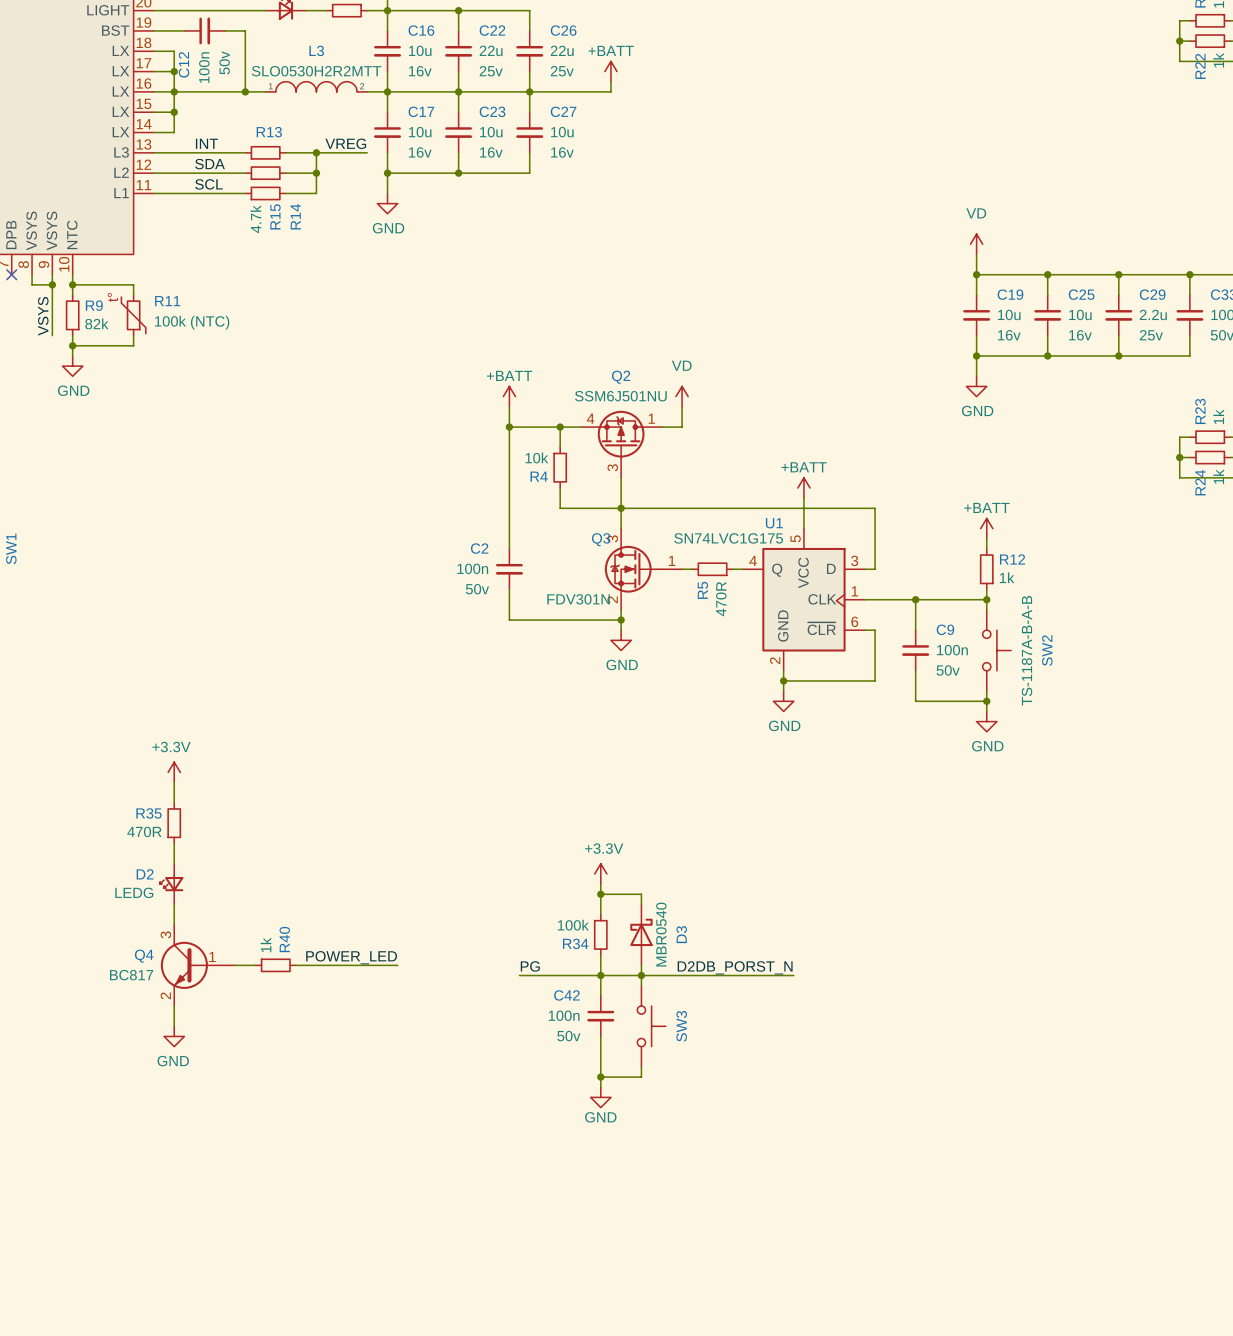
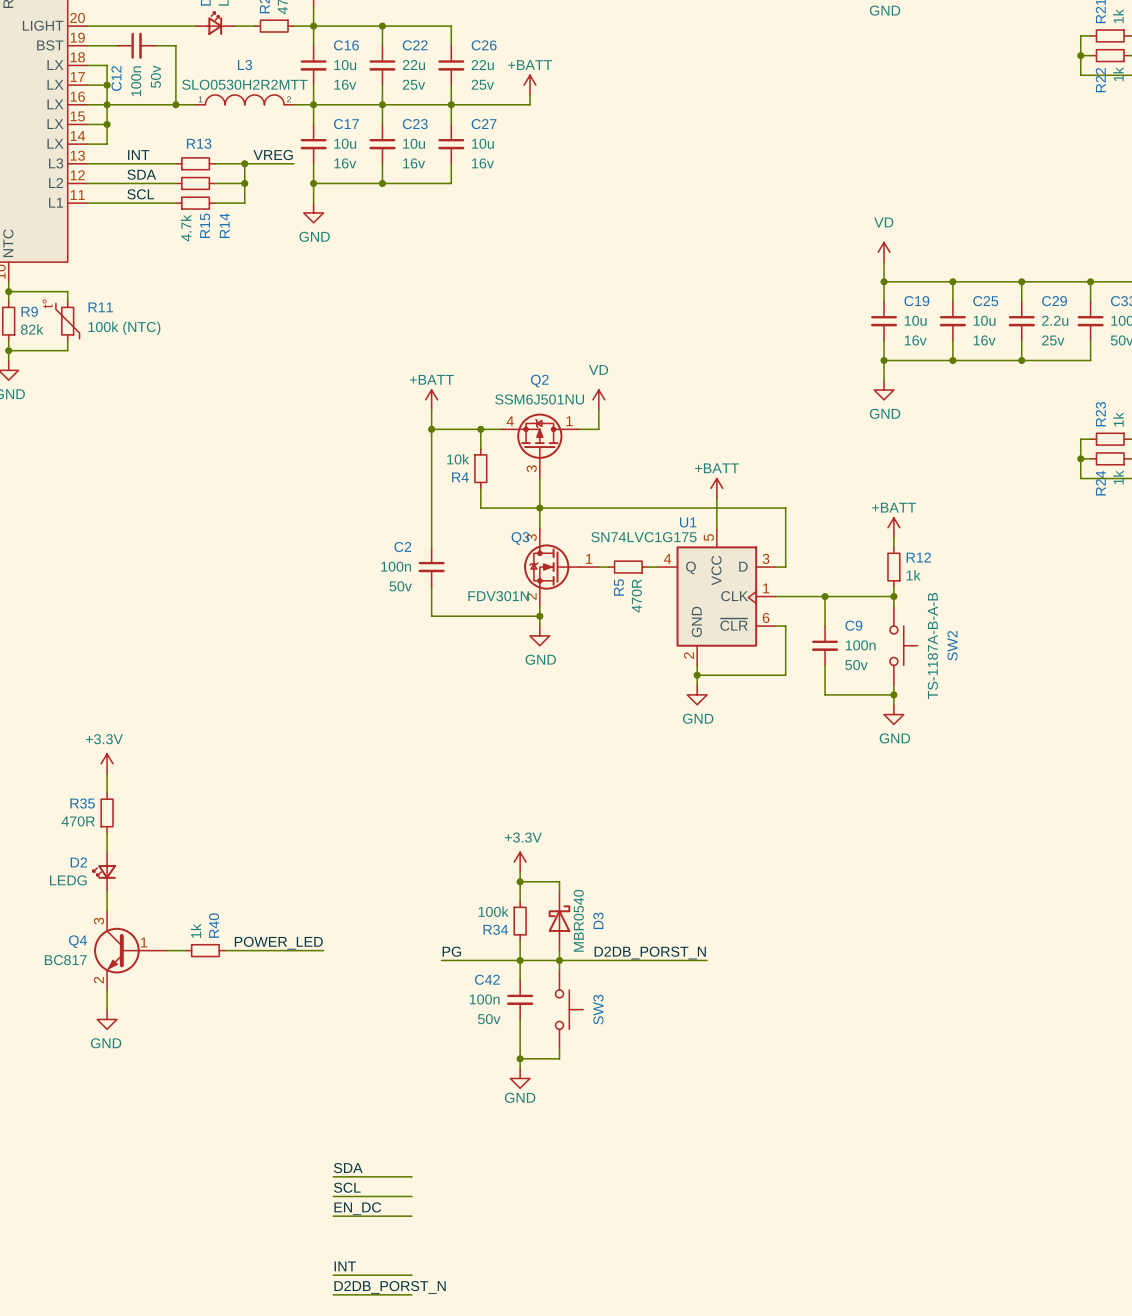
label: none -> SDA (348, 1168)
wire: none -> (333, 1176) (411, 1176)
label: none -> SCL (347, 1187)
wire: none -> (333, 1196) (411, 1196)
label: none -> EN_DC (357, 1208)
wire: none -> (333, 1216) (411, 1216)
label: none -> INT (345, 1266)
wire: none -> (333, 1275) (411, 1275)
label: none -> D2DB_PORST_N (390, 1287)
wire: none -> (333, 1294) (411, 1294)

